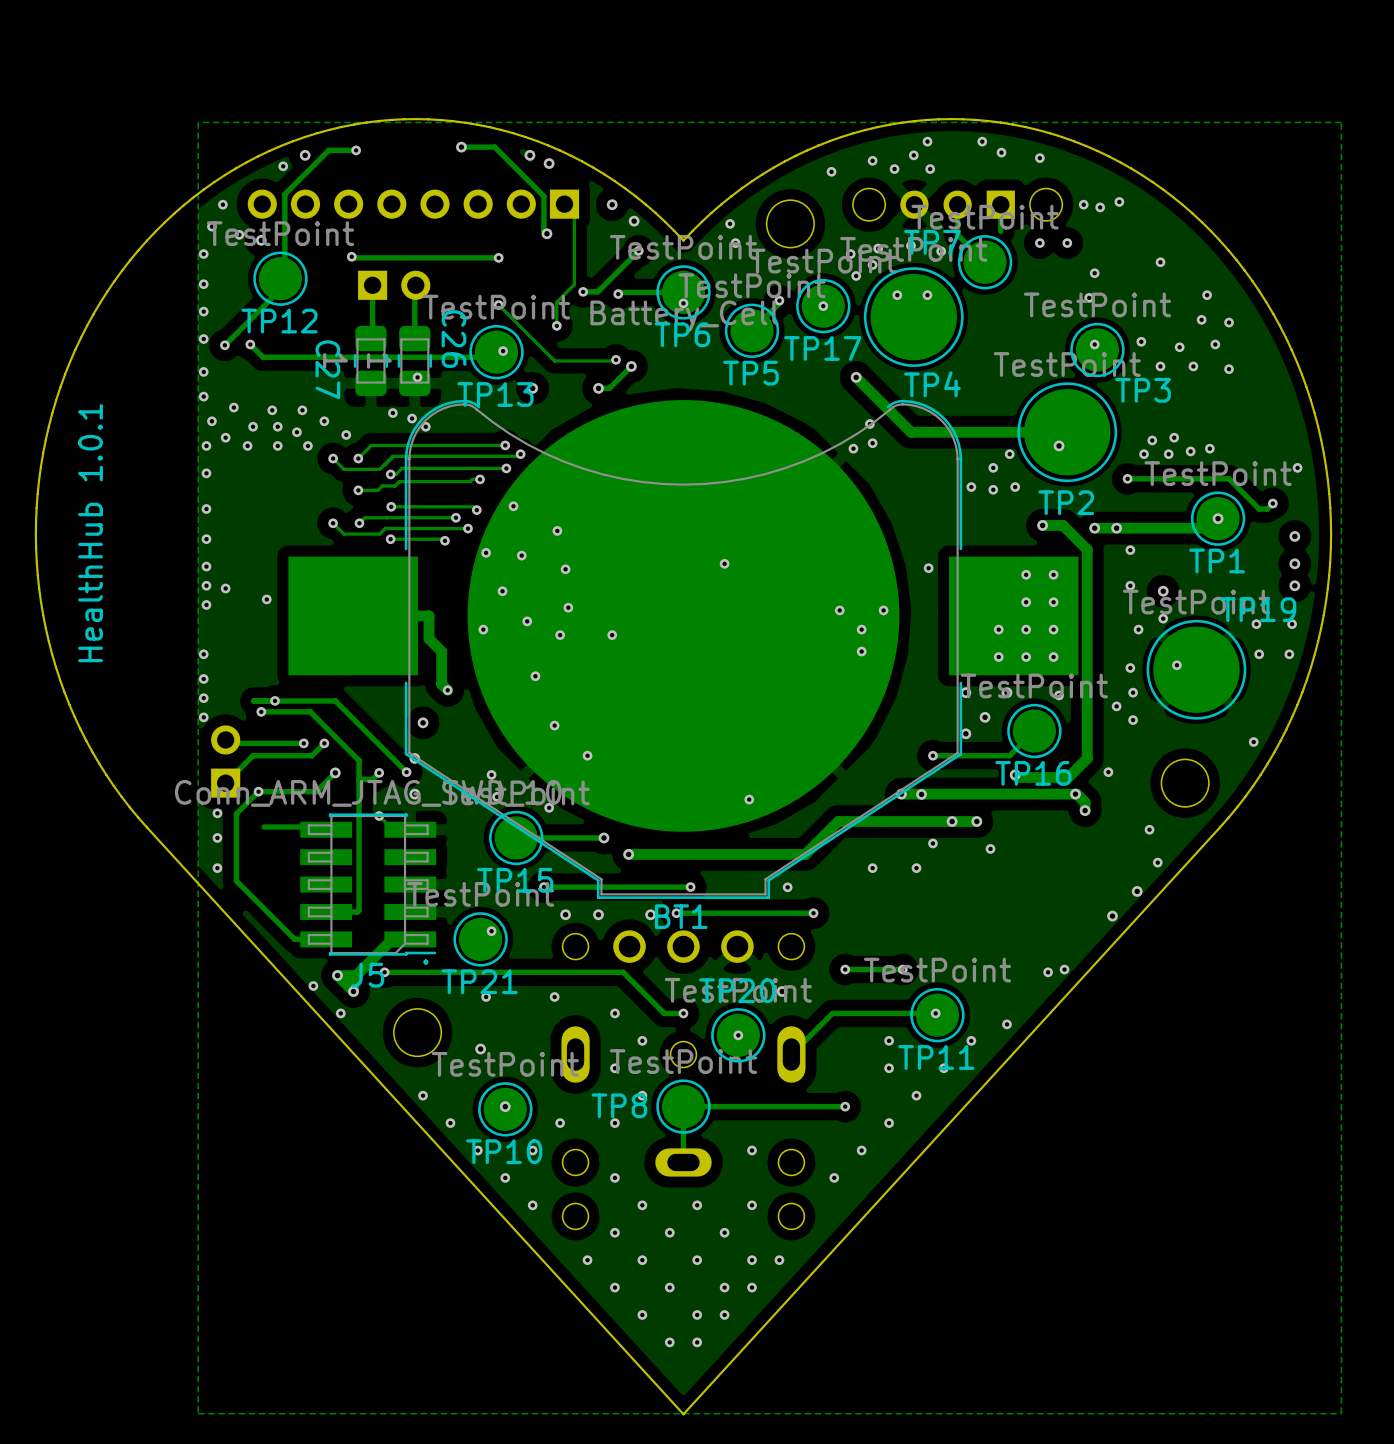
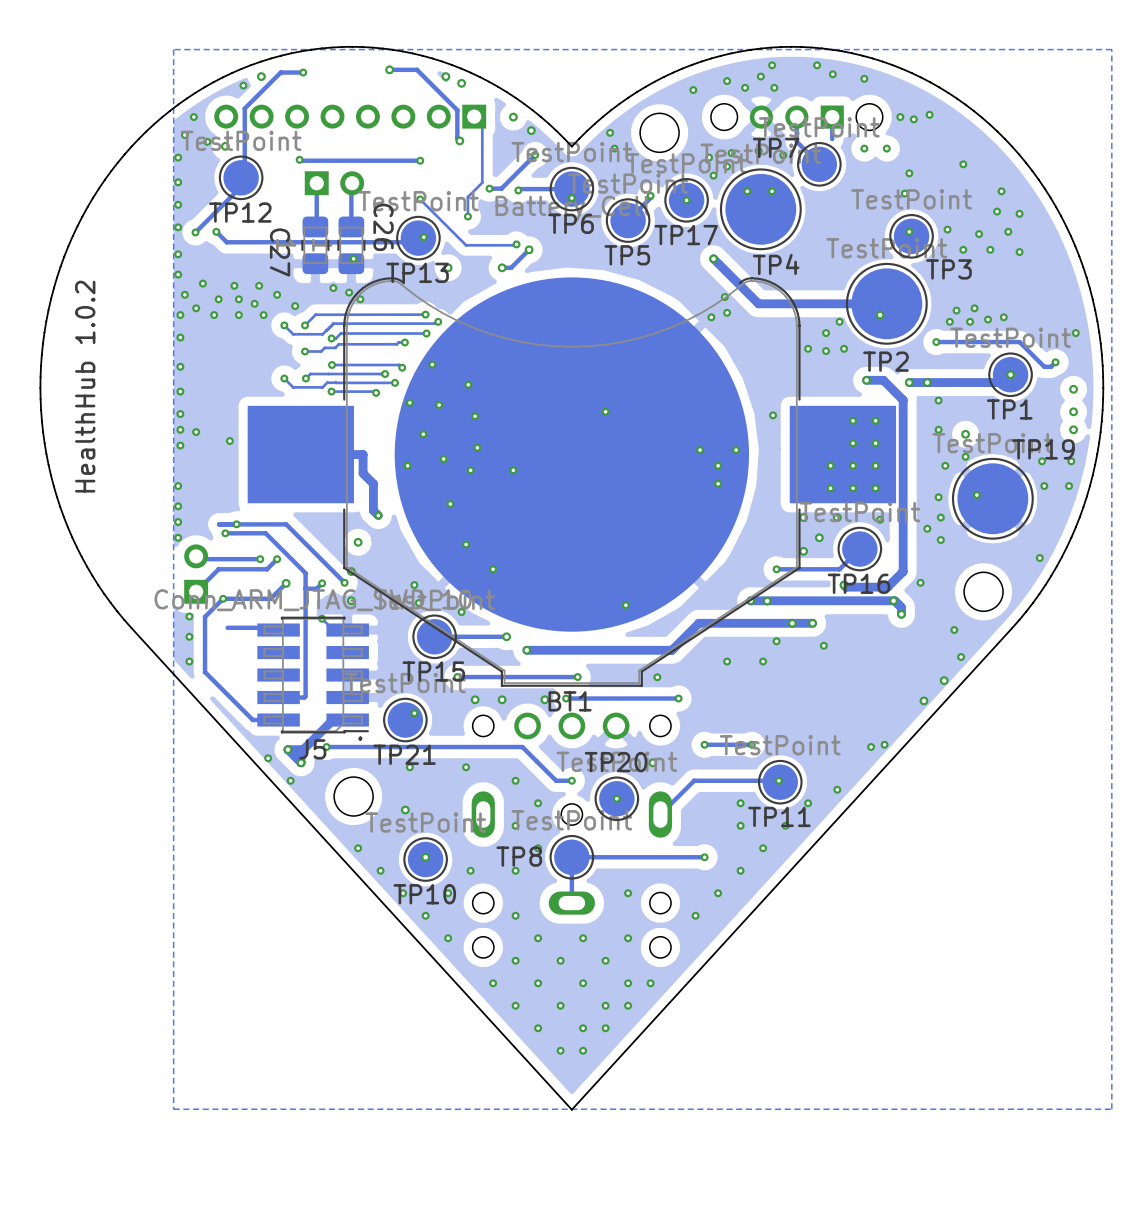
text: HealthHub 1.0.1 (90, 533) -> HealthHub 1.0.2 (85, 386)

